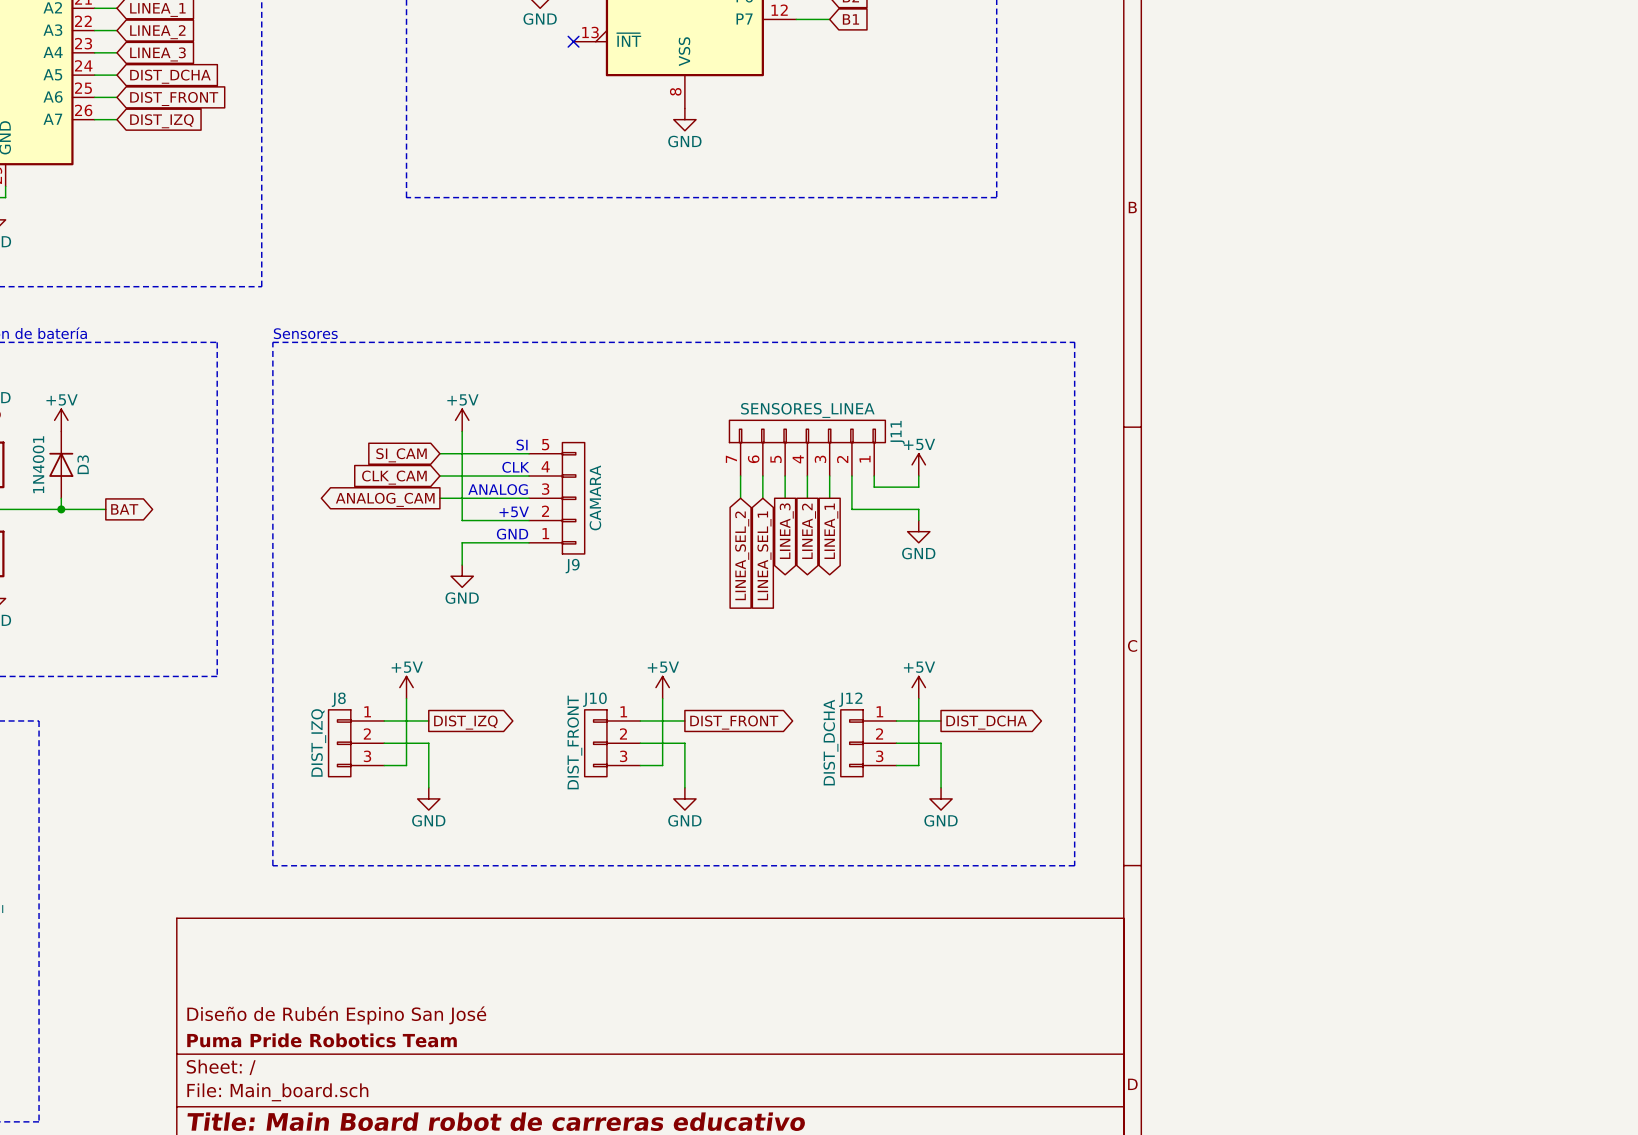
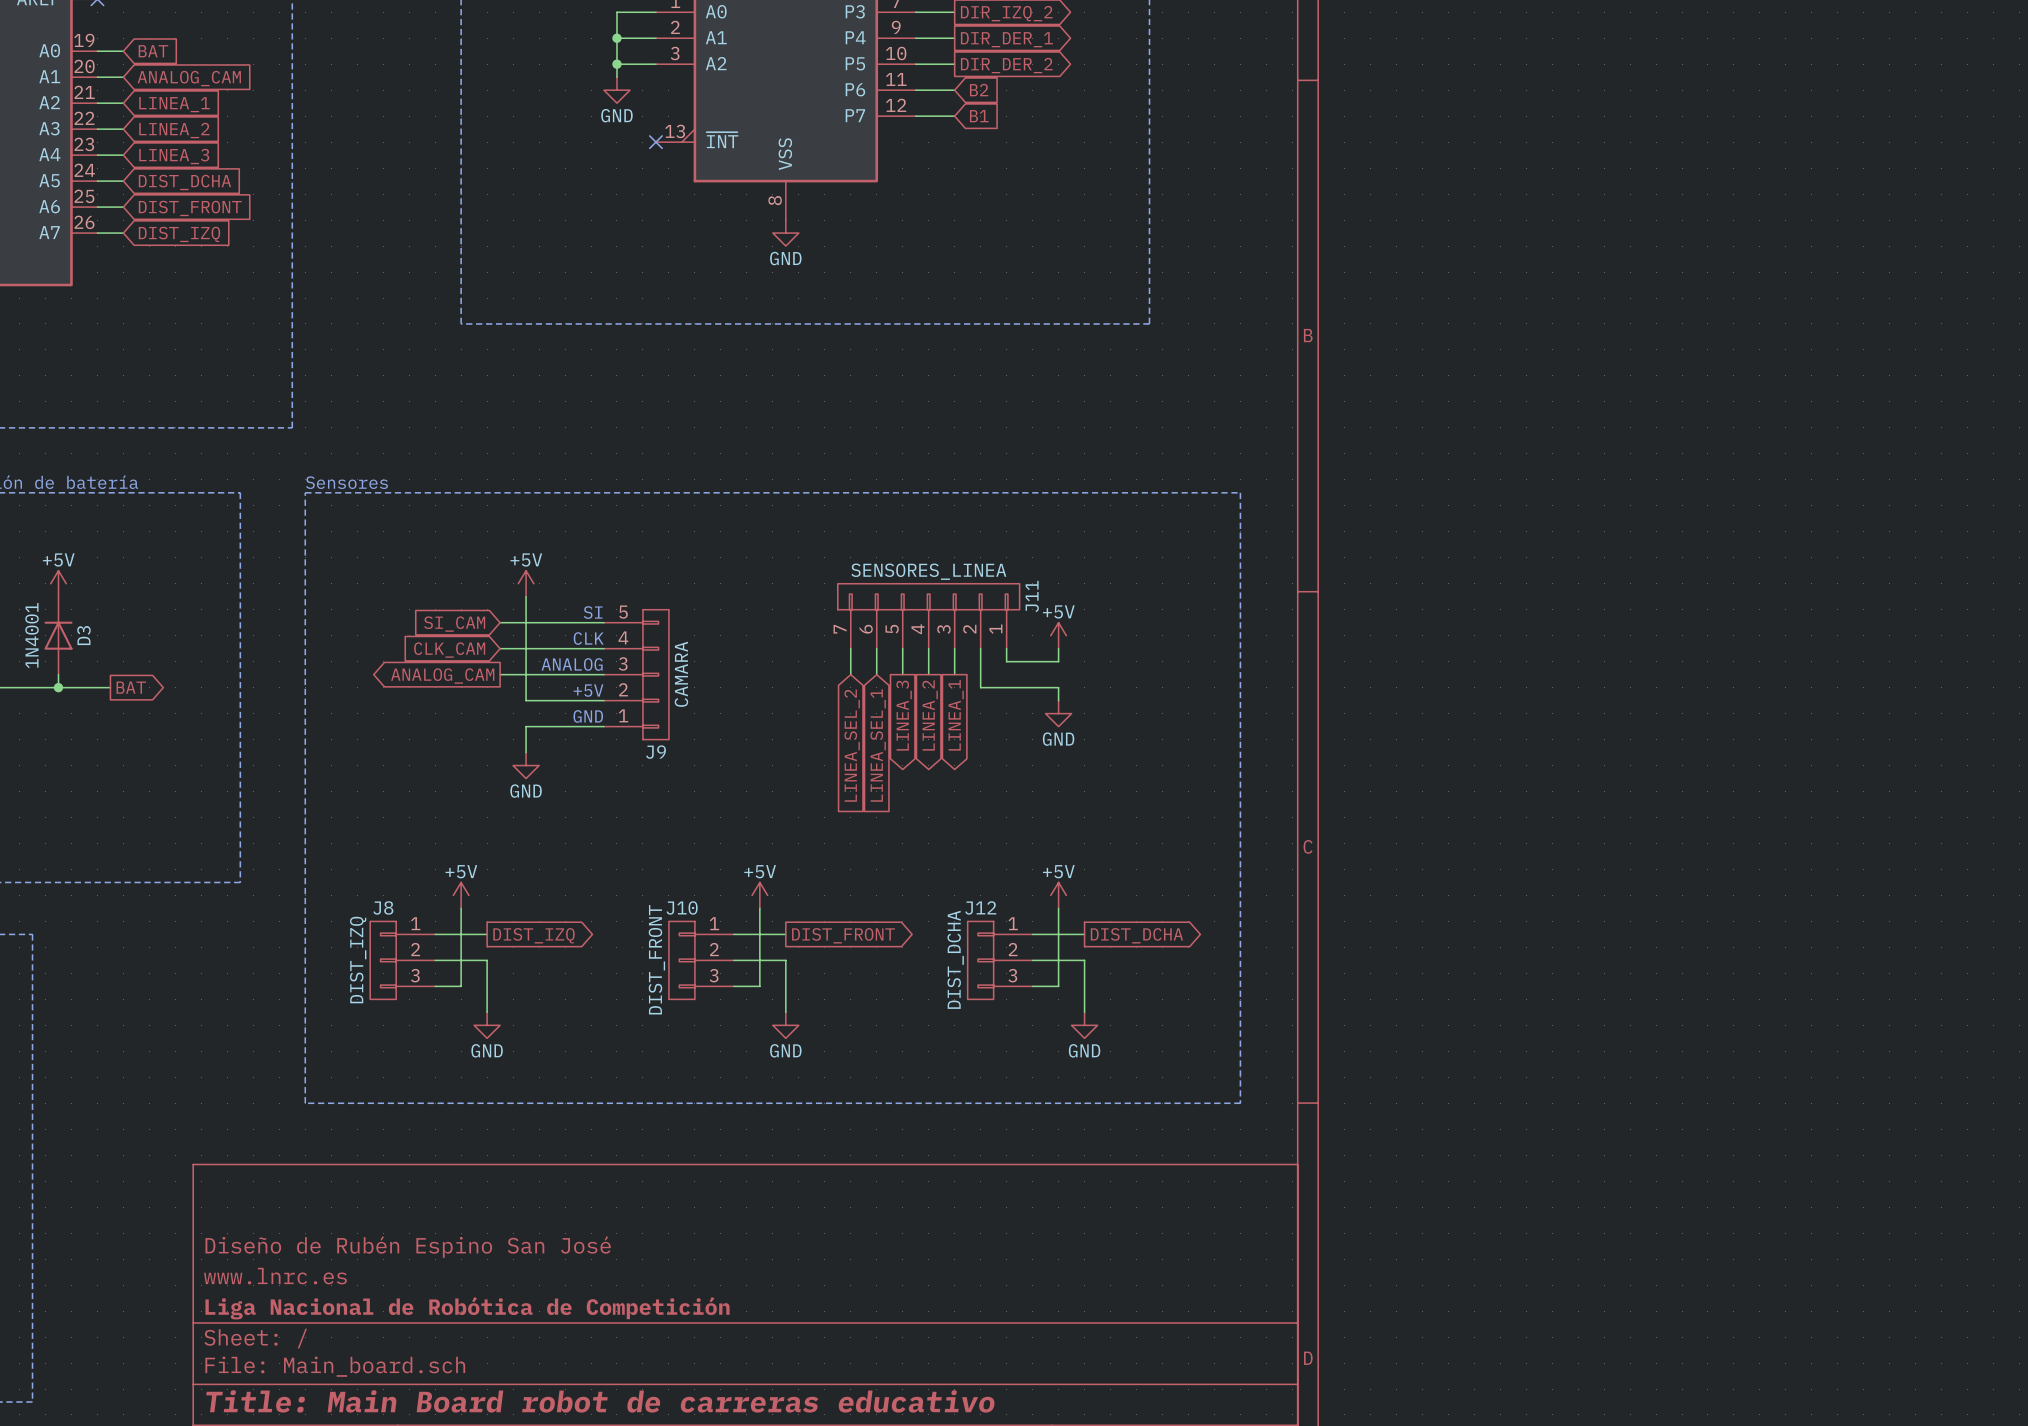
title block: none -> Diseño de Rubén Espino San José (408, 1247)
title block: Diseño de Rubén Espino San José (336, 1015) -> www.lnrc.es (275, 1276)
title block: Puma Pride Robotics Team (322, 1040) -> Liga Nacional de Robótica de Competición (467, 1308)

